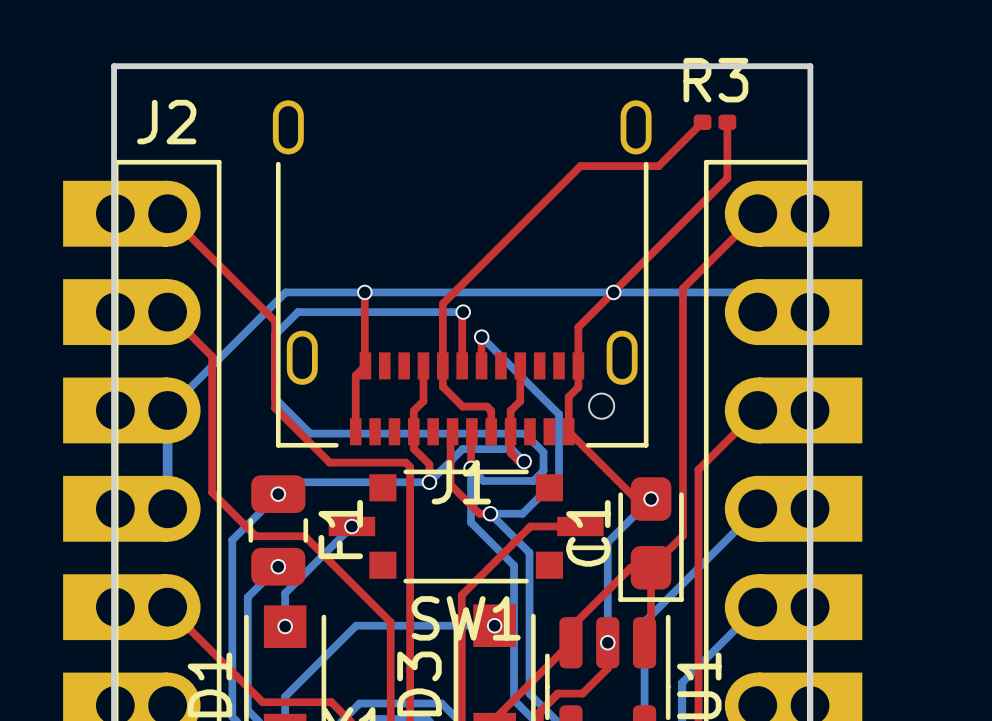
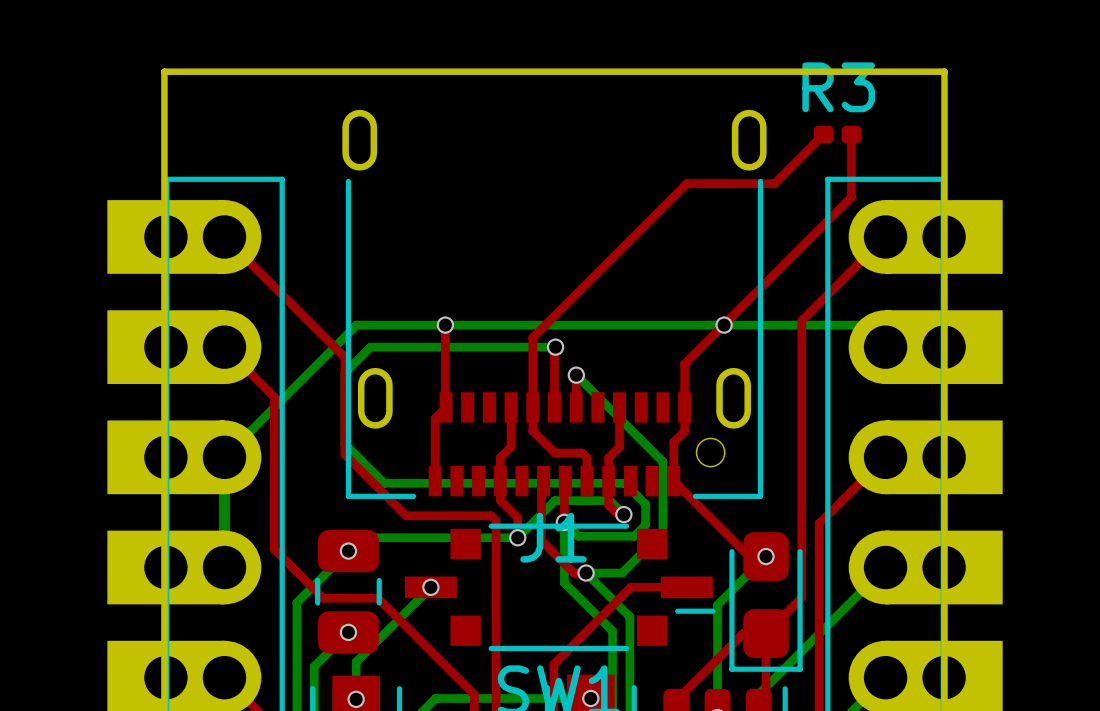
J2 name: J2 (166, 122) -> none
F1 name: F1 (340, 529) -> none
C1 name: C1 (588, 533) -> none

